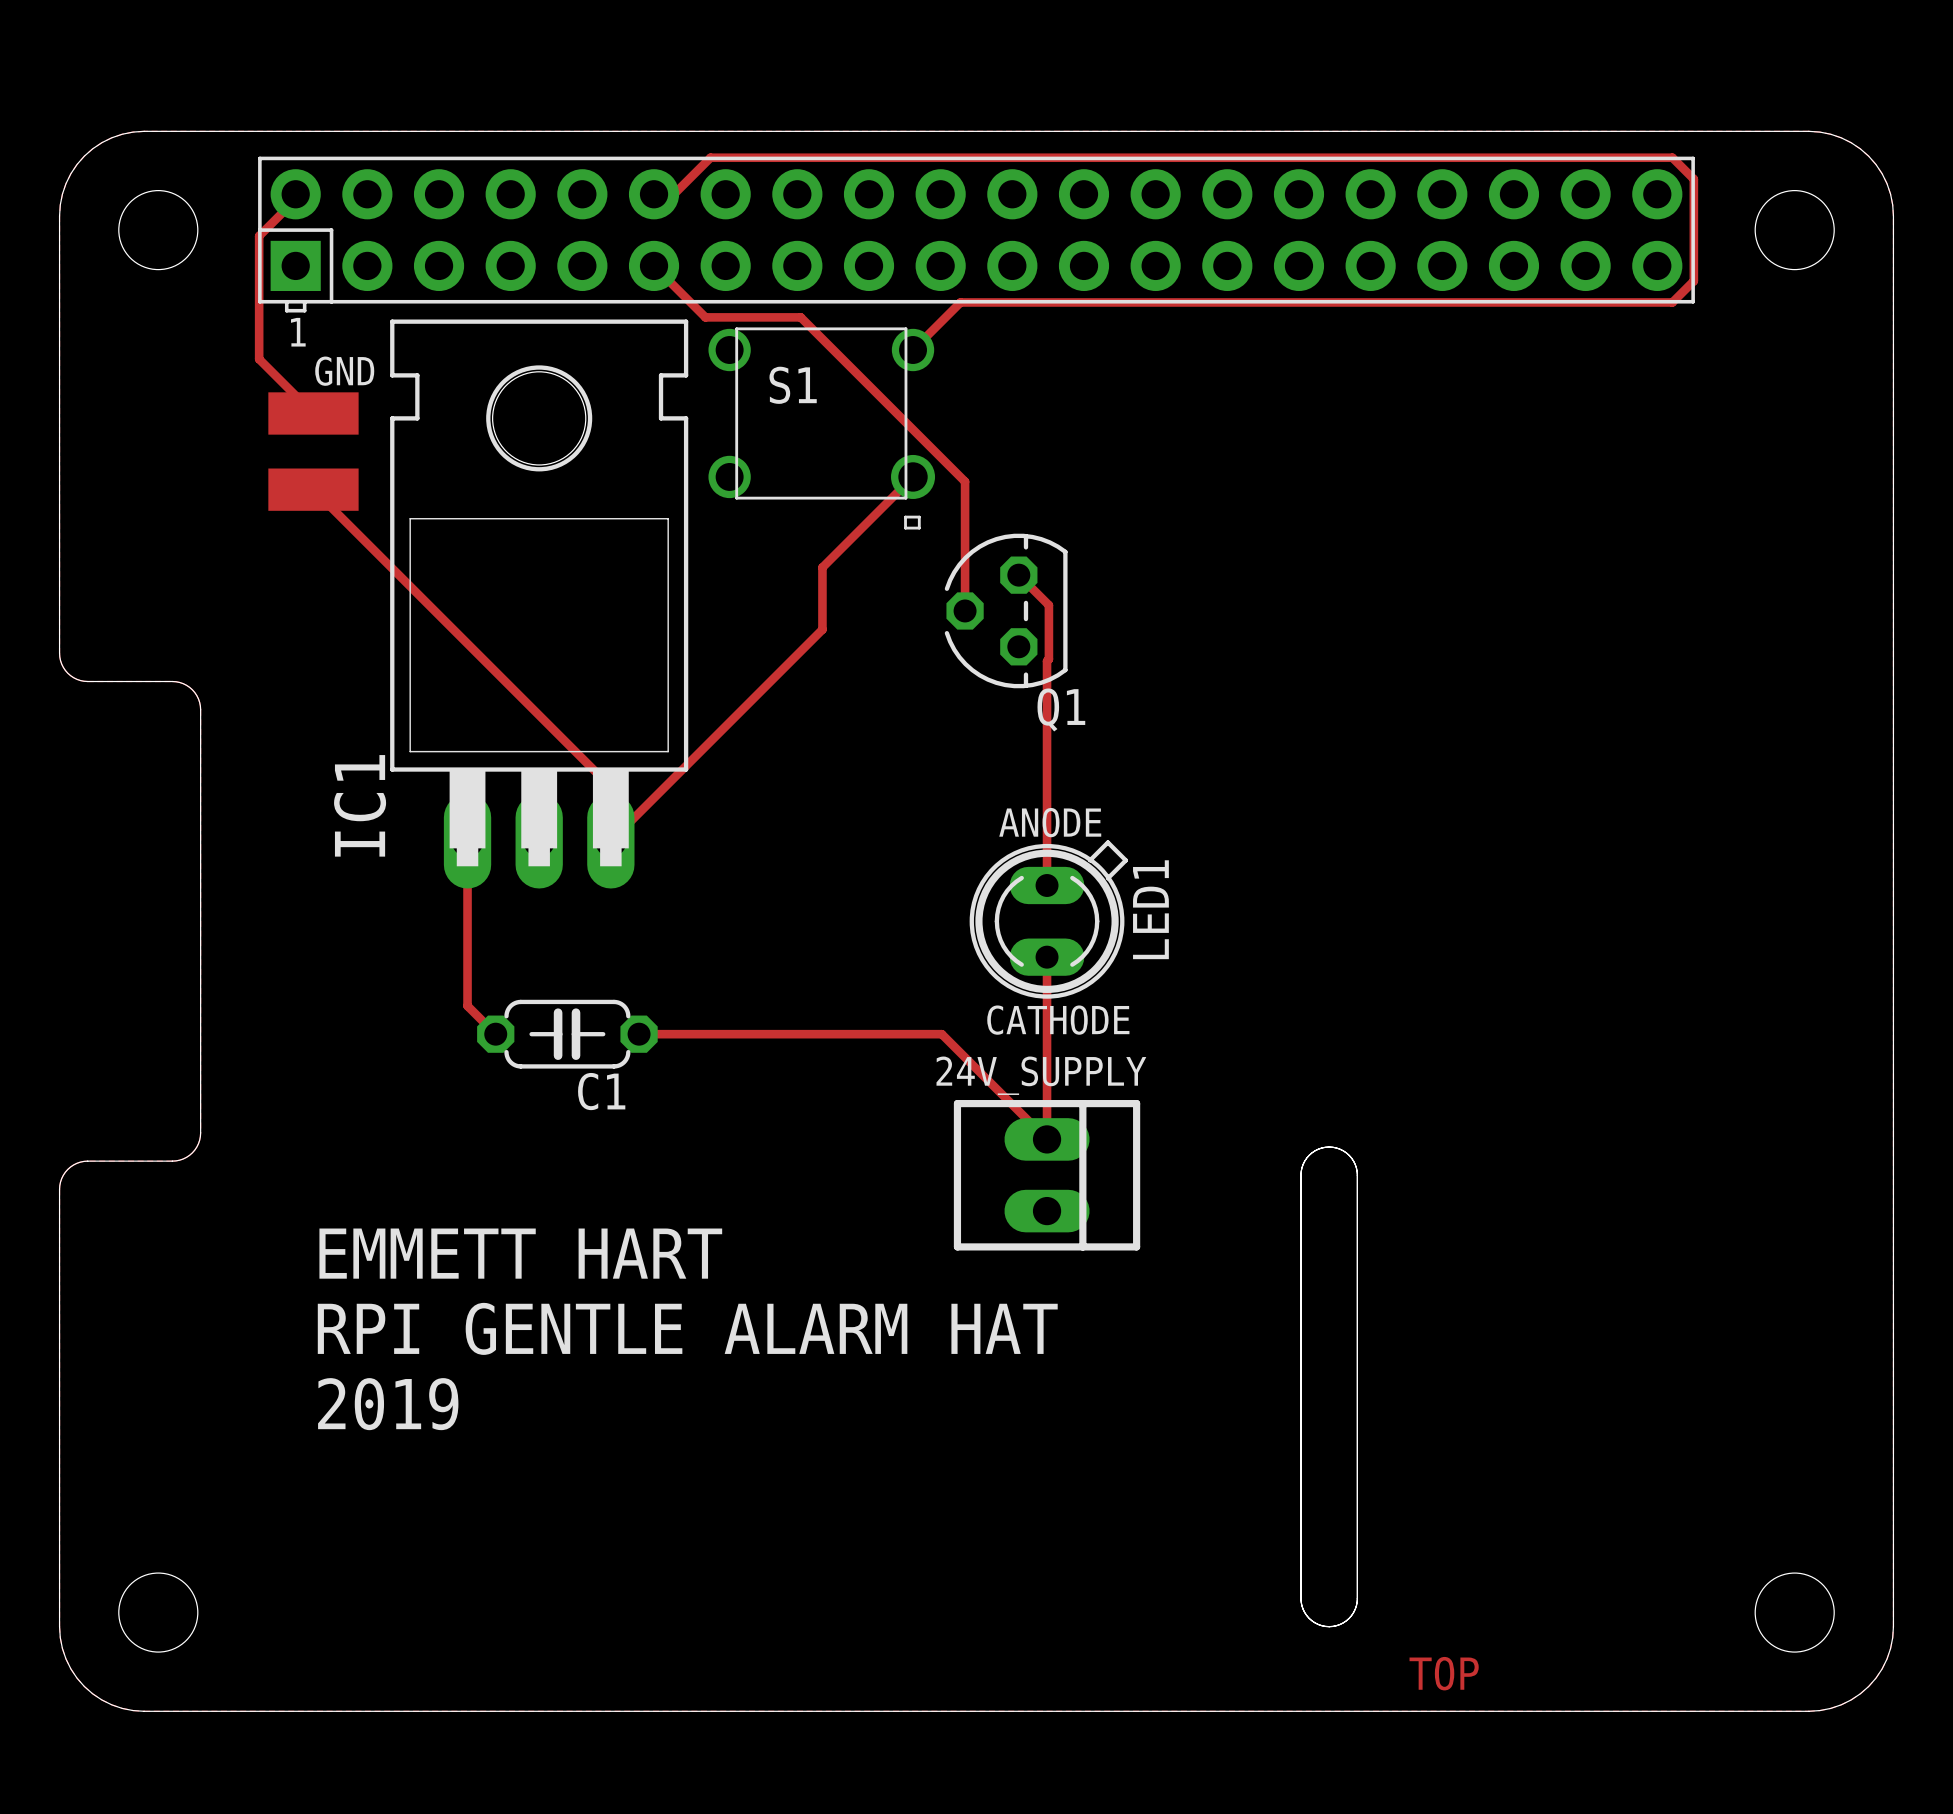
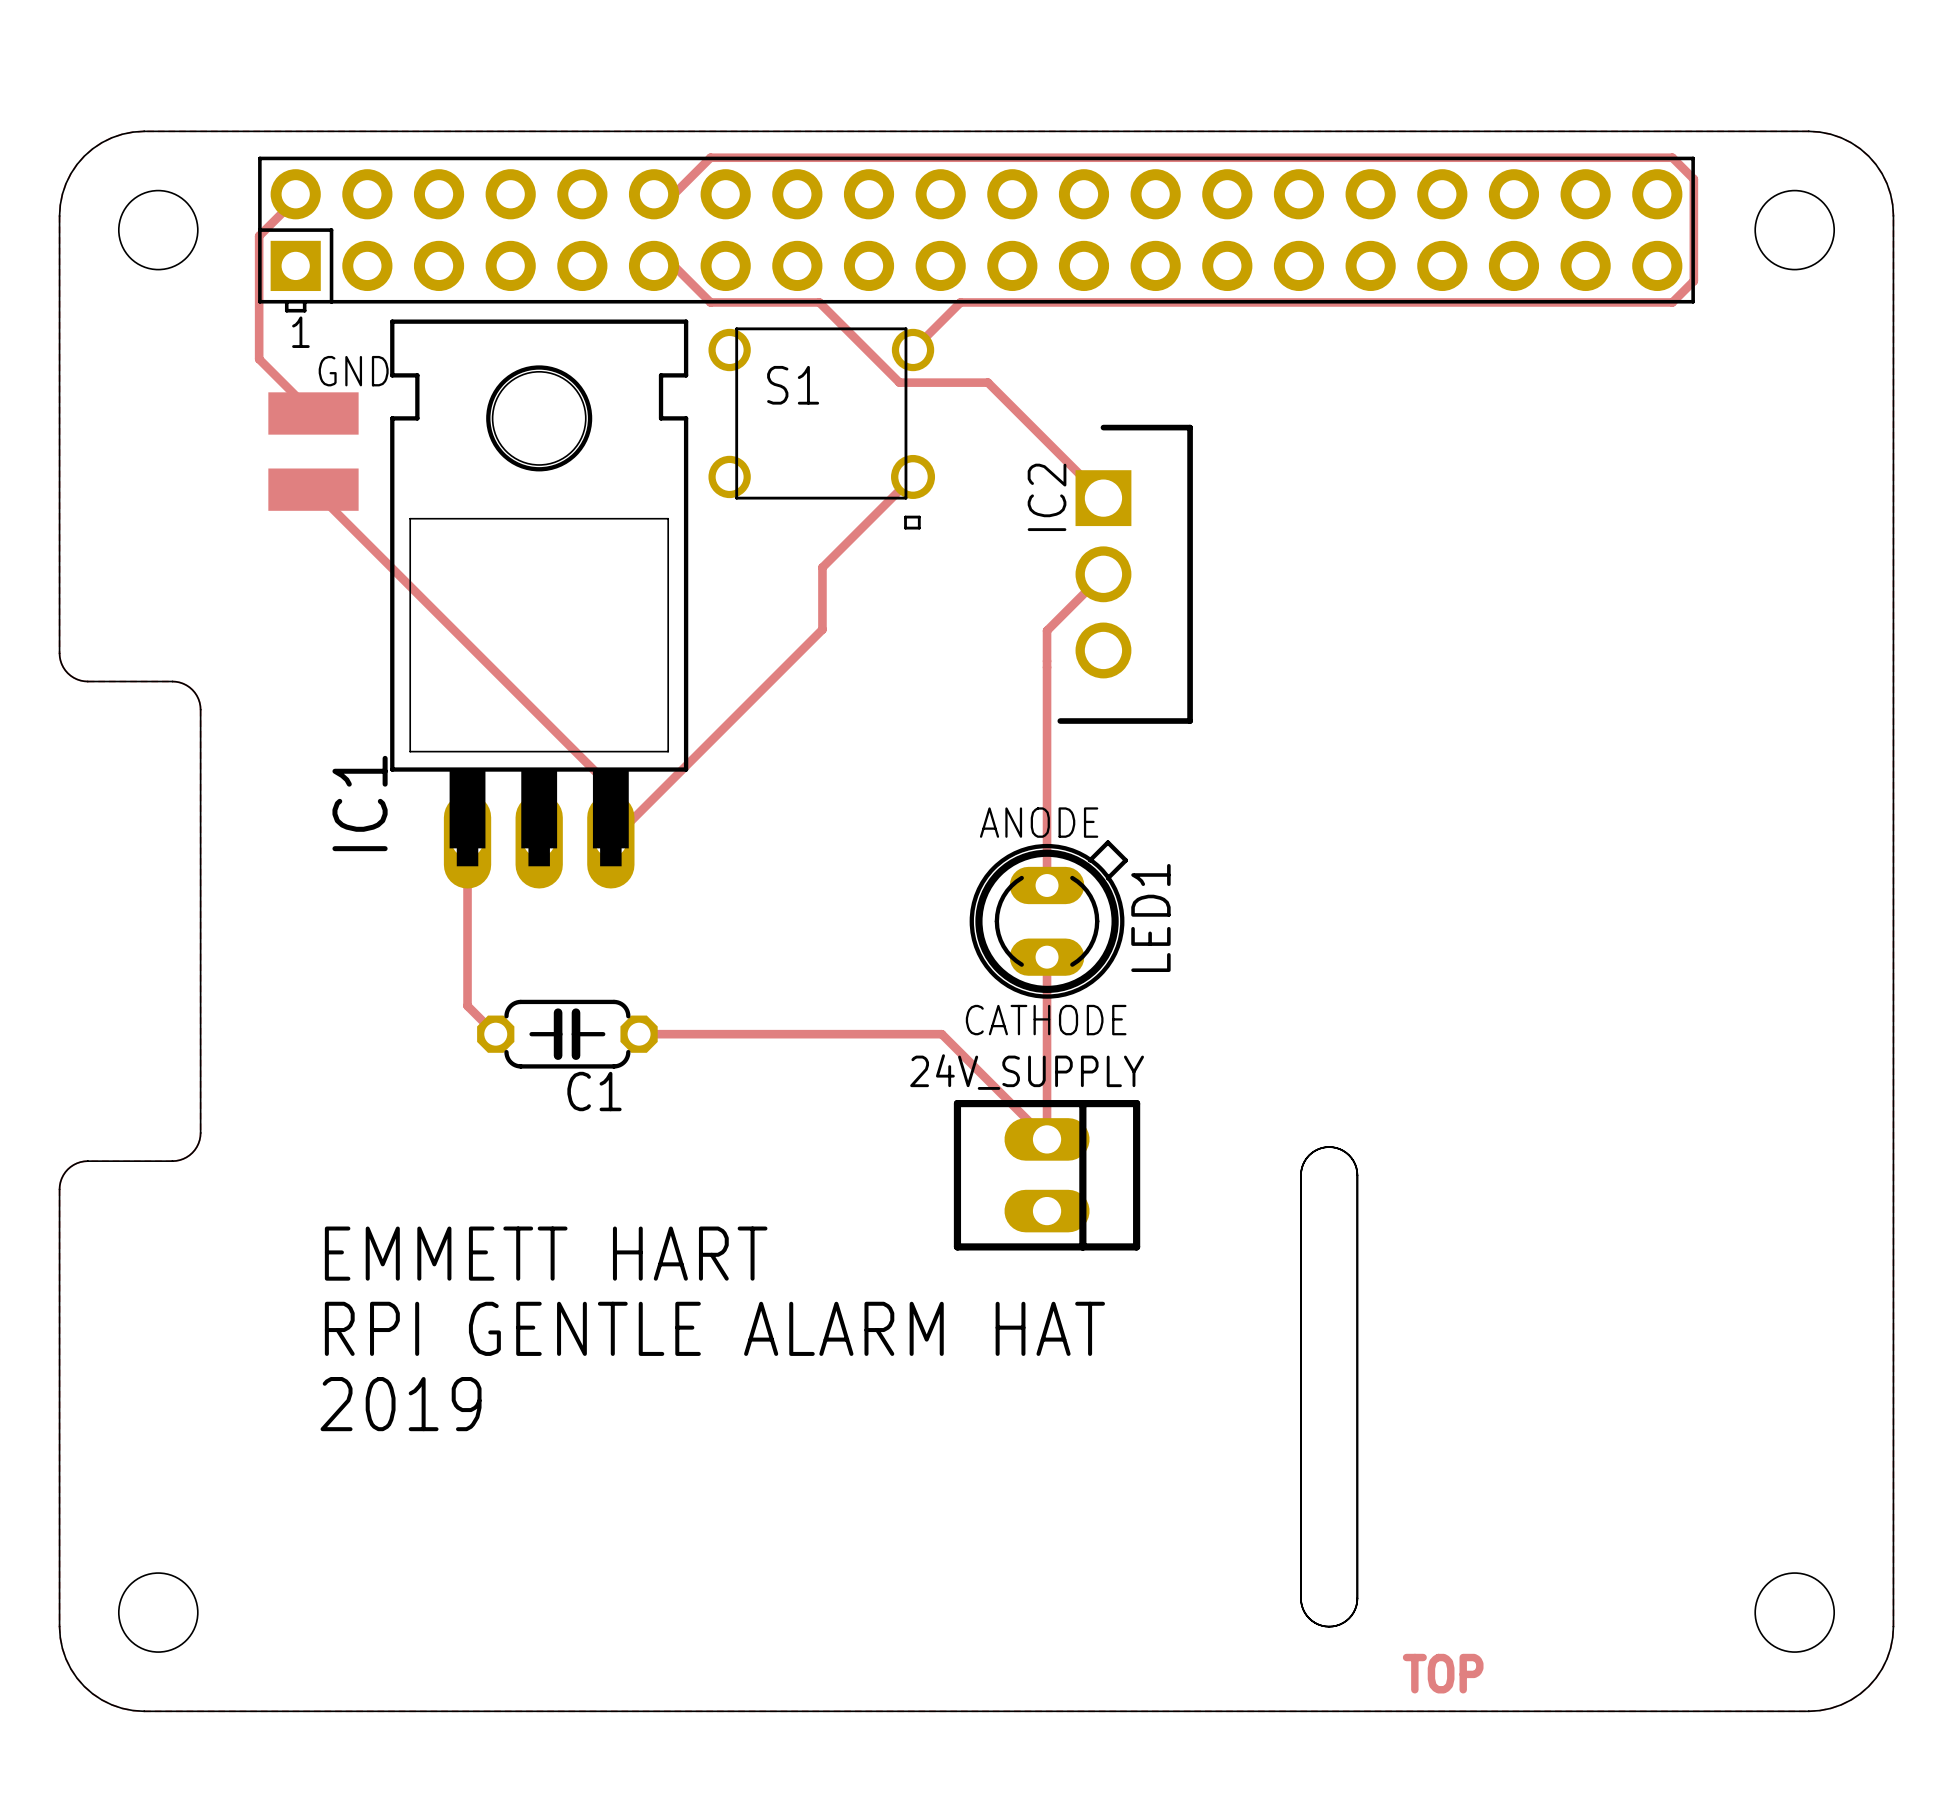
track: (654, 265) (705, 317) (800, 317) (965, 481) (965, 610) -> (654, 265) (673, 265) (710, 302) (819, 302) (899, 382) (987, 382) (1103, 498)
IC2: none -> (1125, 574)
track: (1018, 575) (1048, 605) (1048, 659) (1047, 661) -> (1103, 574) (1047, 630) (1047, 661)
Q1: (1006, 610) -> none

